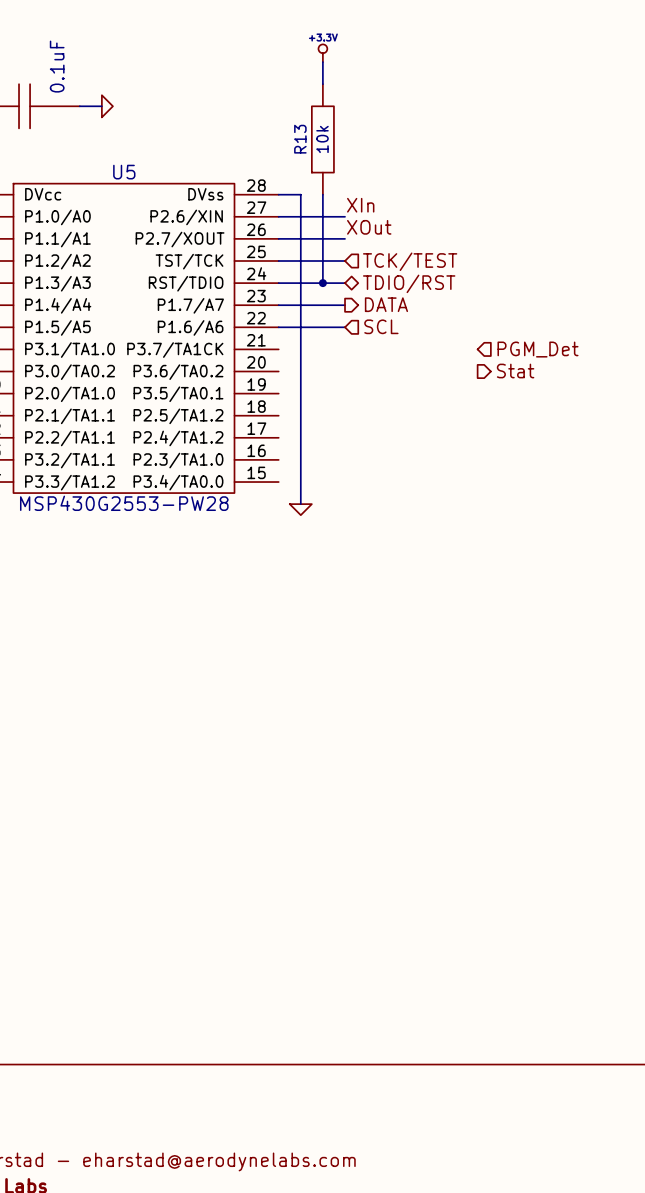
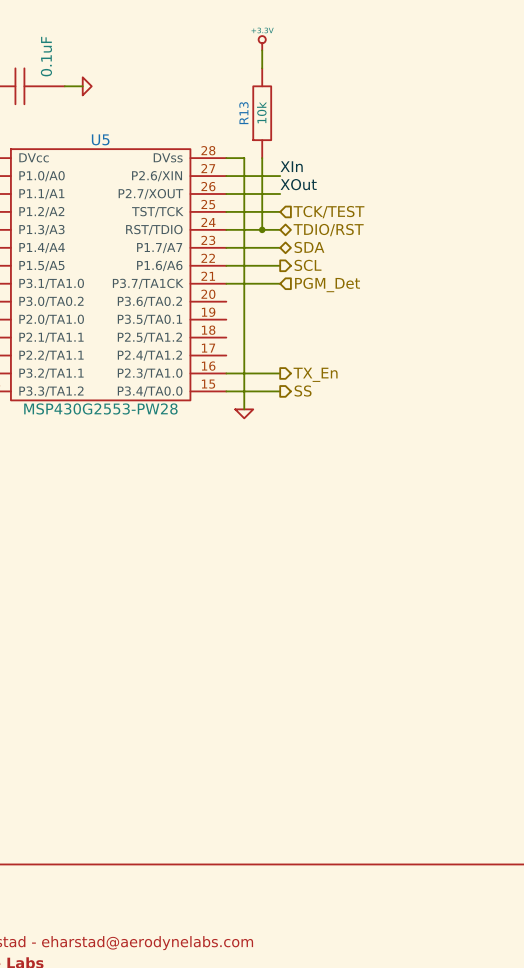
hierarchical label shape: output (386, 304) -> bidirectional (309, 247)
hierarchical label: DATA (386, 304) -> SDA (309, 247)
hierarchical label shape: input (381, 326) -> output (308, 265)
wire: none -> (226, 283) (280, 283)
hierarchical label position: PGM_Det (538, 349) -> PGM_Det (327, 284)
hierarchical label: Stat (515, 371) -> none
wire: none -> (226, 373) (280, 373)
hierarchical label: none -> TX_En (315, 374)
hierarchical label: none -> SS (303, 391)
wire: none -> (226, 391) (280, 391)

